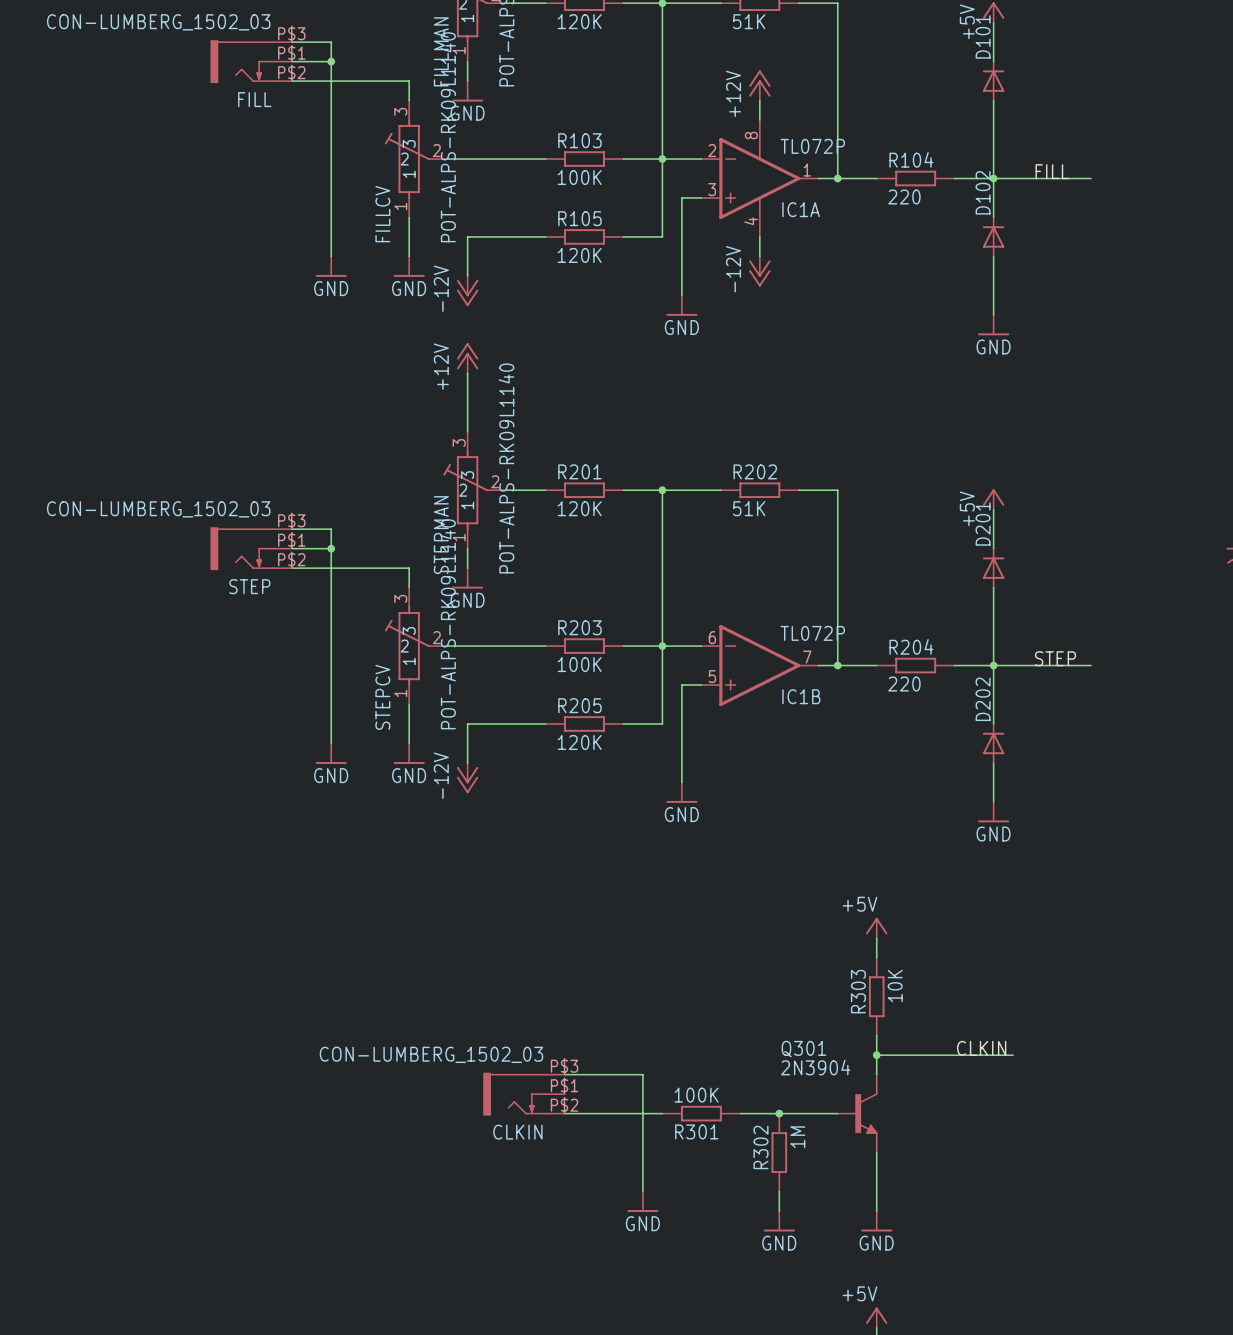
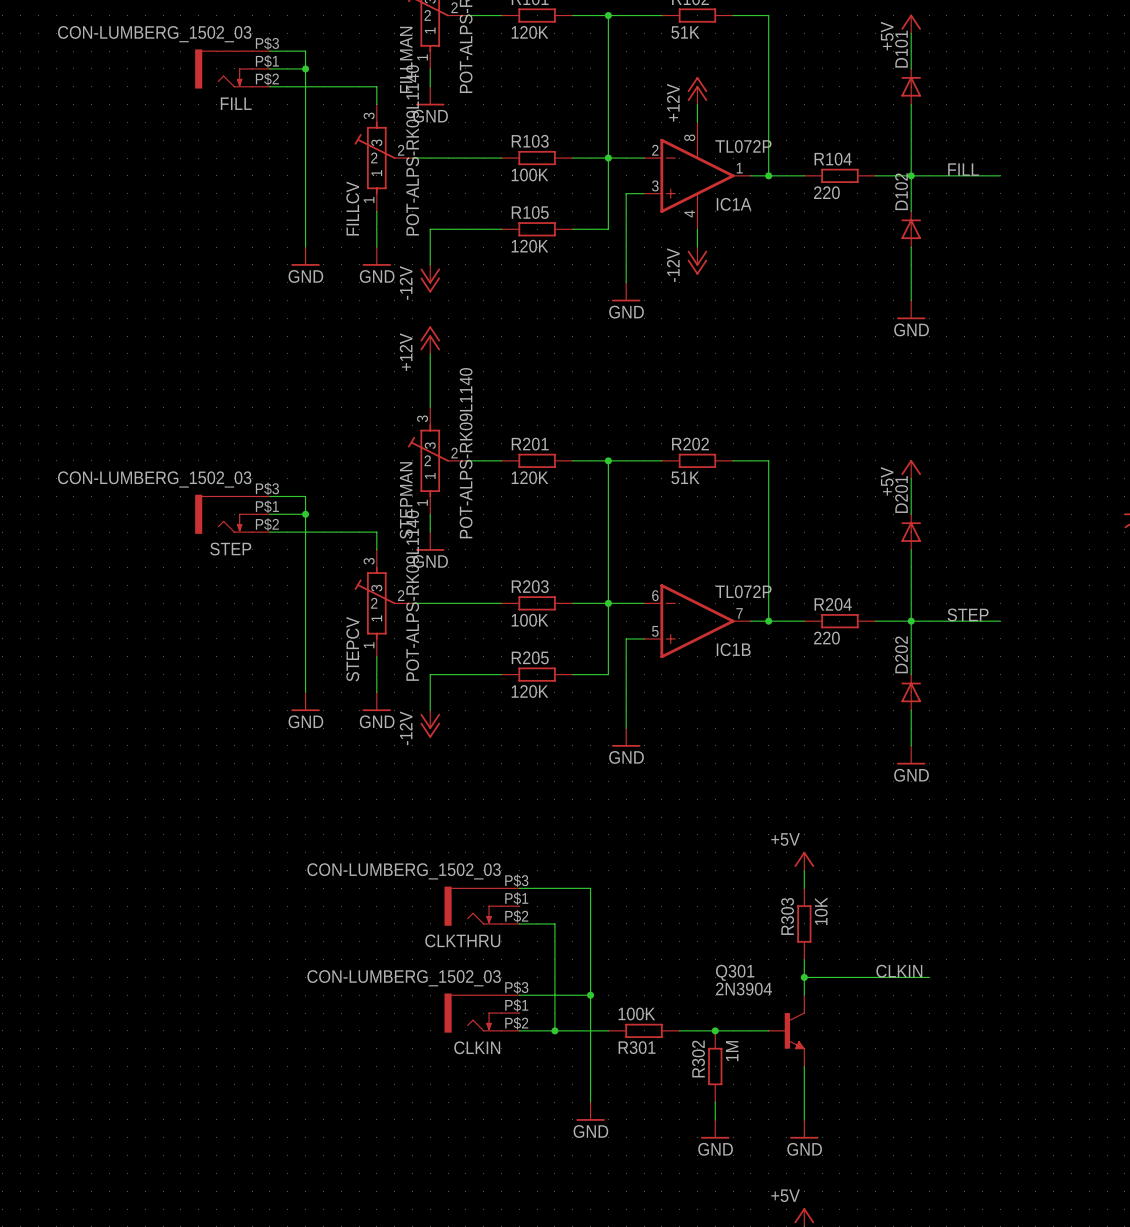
wire: none -> (519, 888) (590, 888) (590, 995)
CLKTHRU: none -> CON-LUMBERG_1502_03 (481, 906)
wire: none -> (519, 923) (554, 923) (554, 1030)
junction: none -> (590, 995)
junction: none -> (554, 1030)

